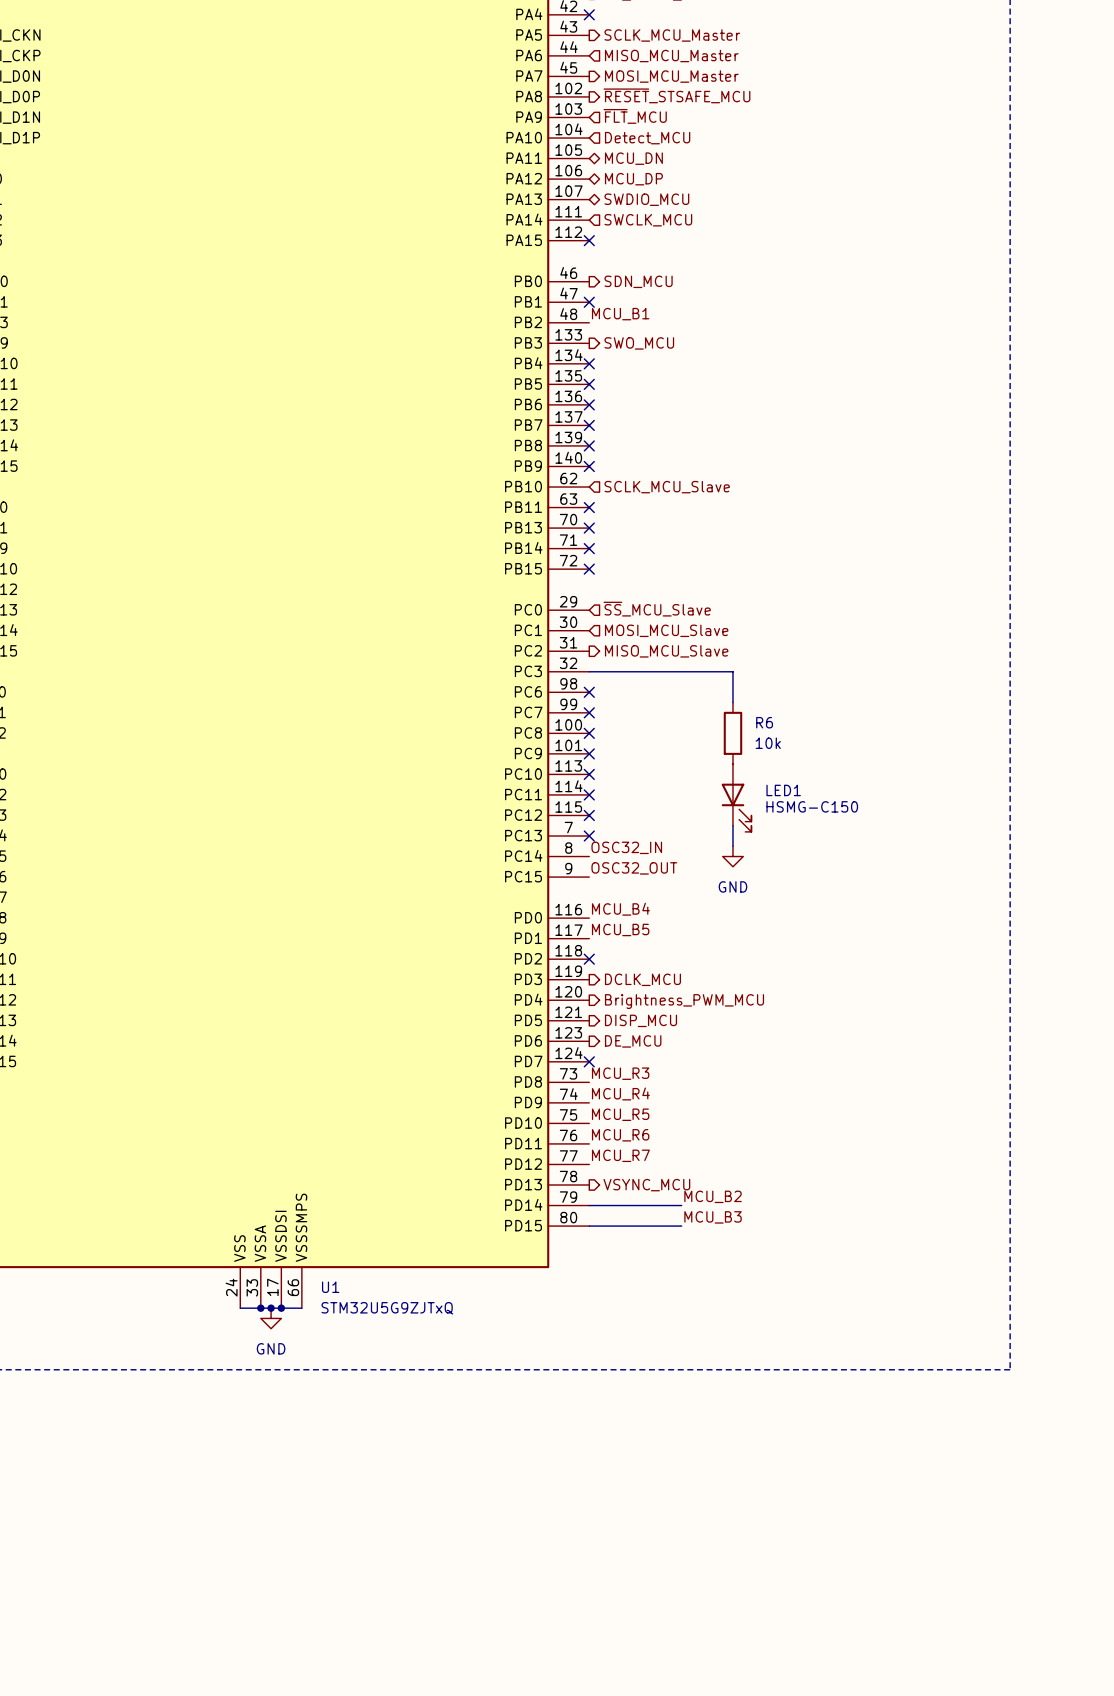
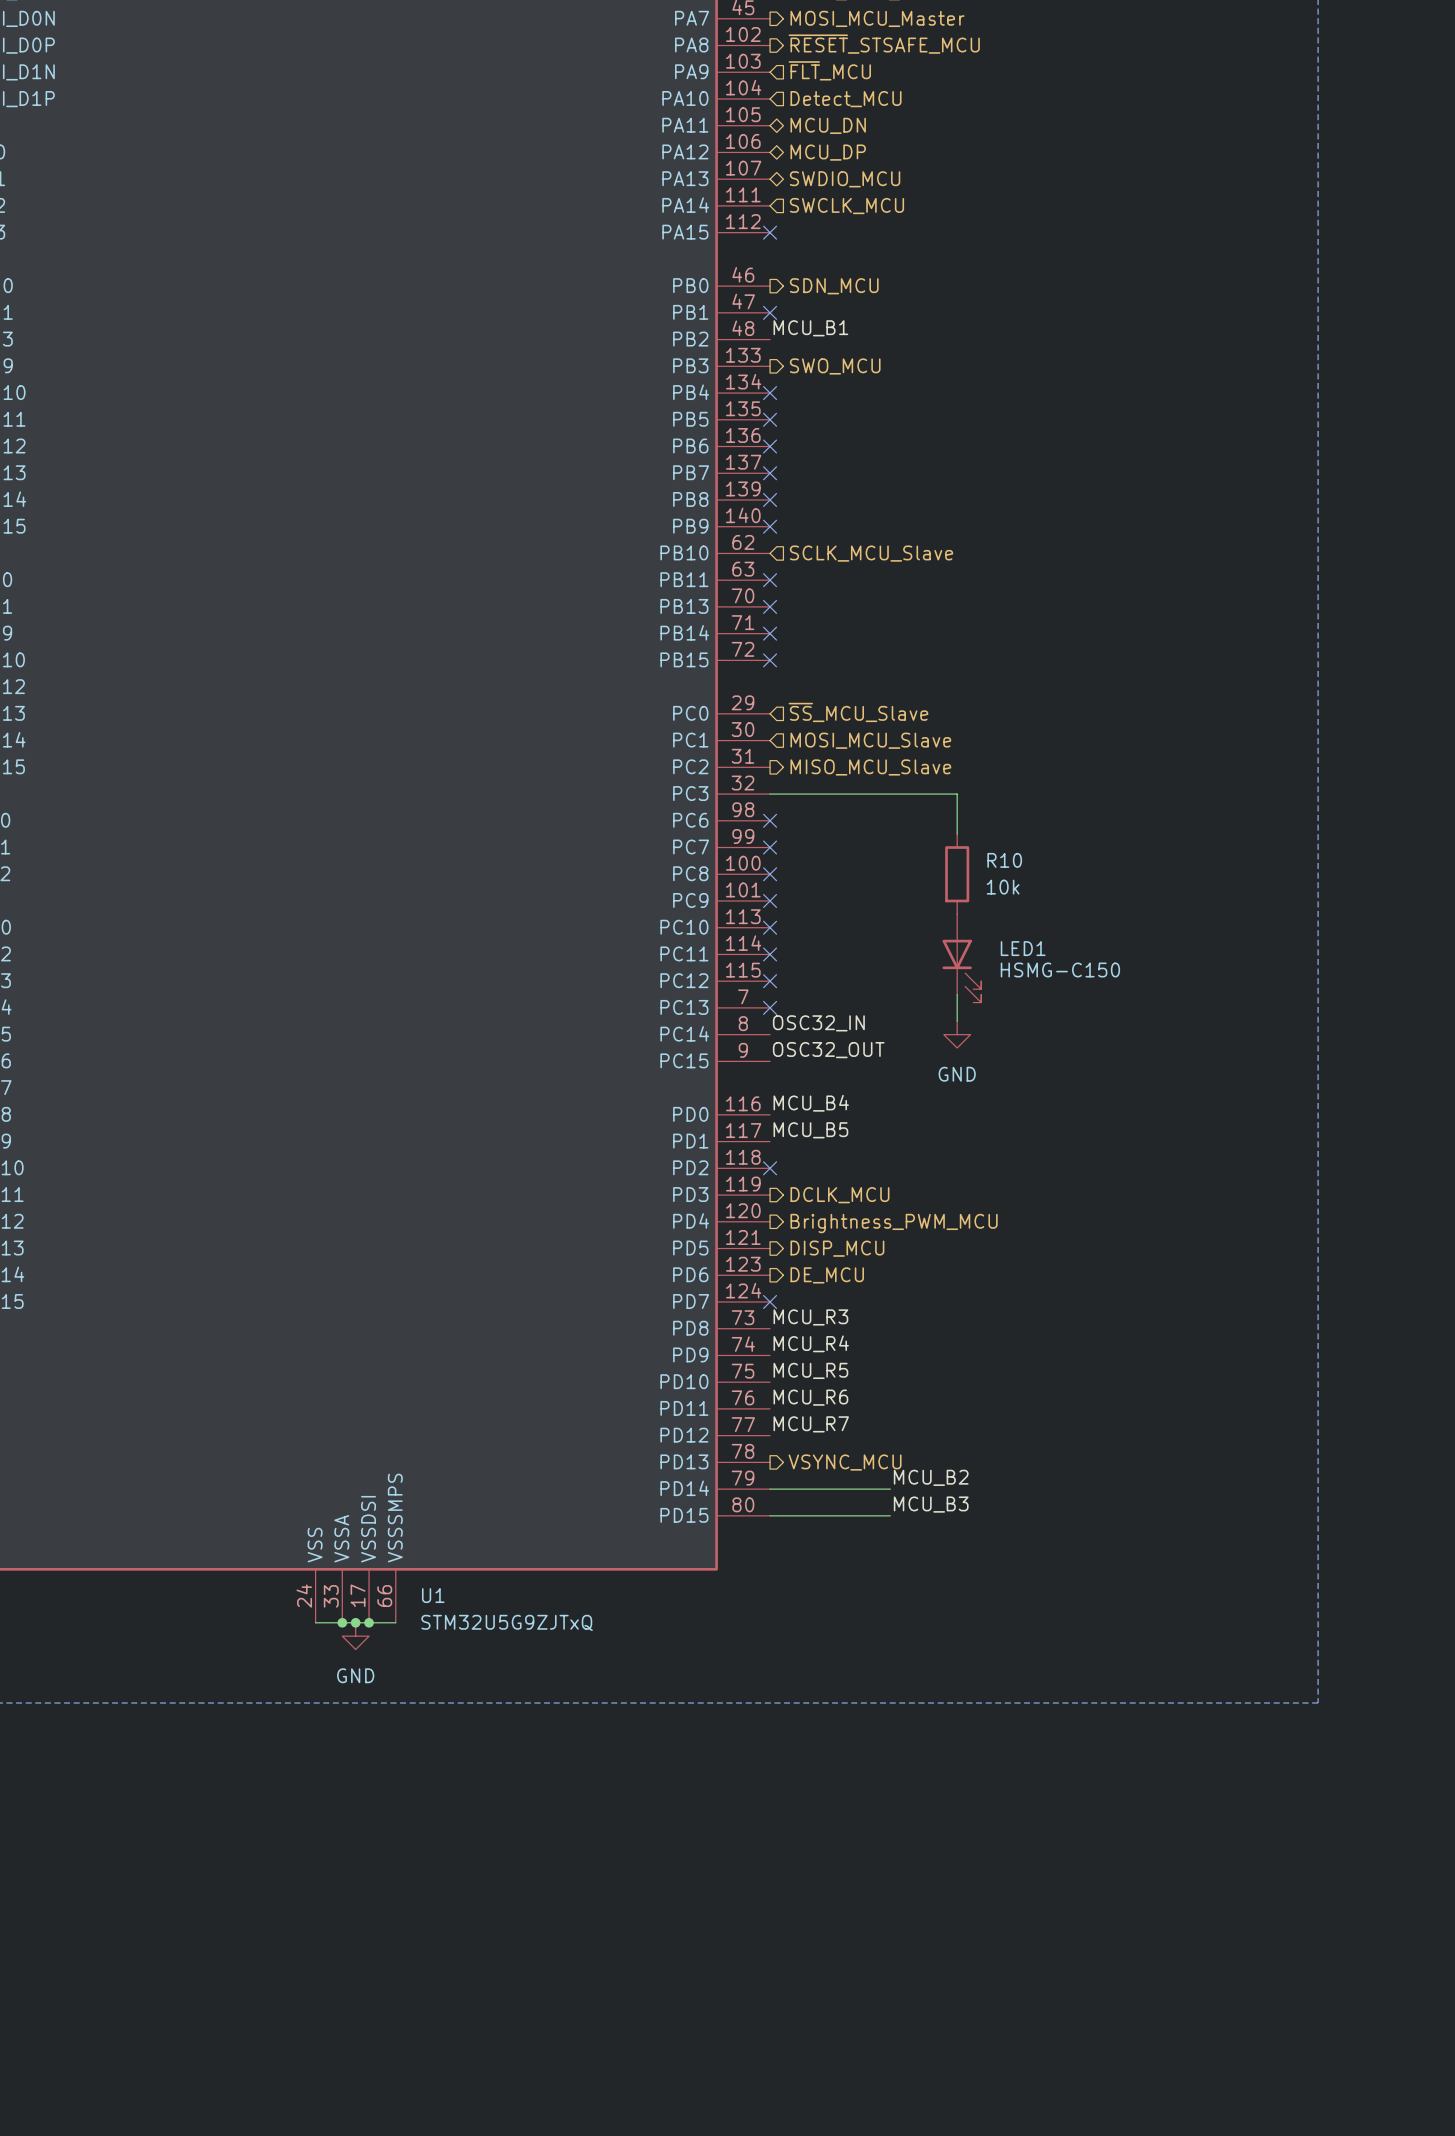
R6 name: R6 (764, 722) -> R10 (1004, 860)

